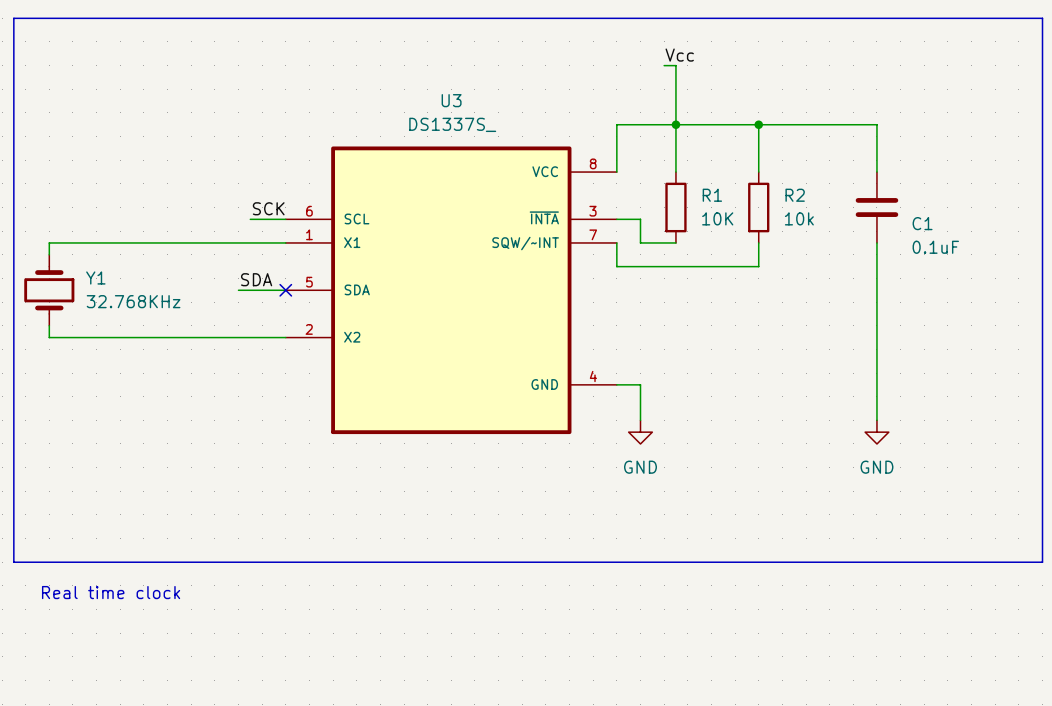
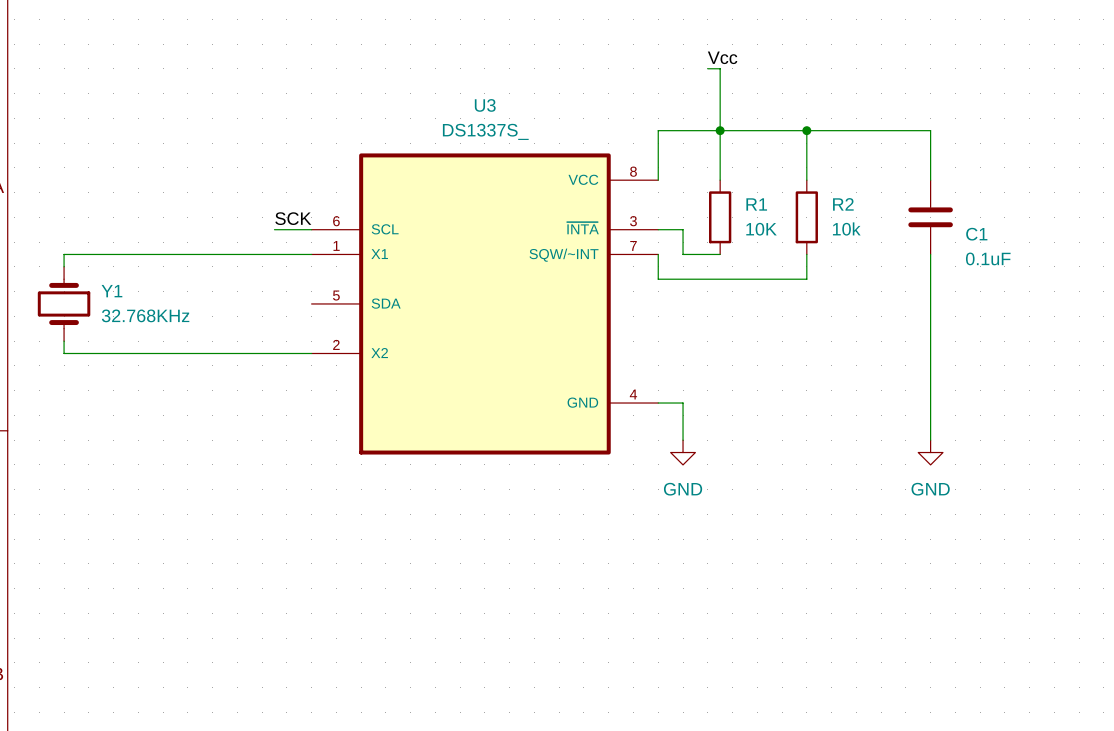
line: (13, 18) (1042, 18) (1042, 562) (13, 562) (13, 18) -> none
label: SDA (256, 279) -> none
wire: (238, 290) (285, 290) -> none
no-connect mark: (285, 290) -> none
text: Real time clock (111, 592) -> none

